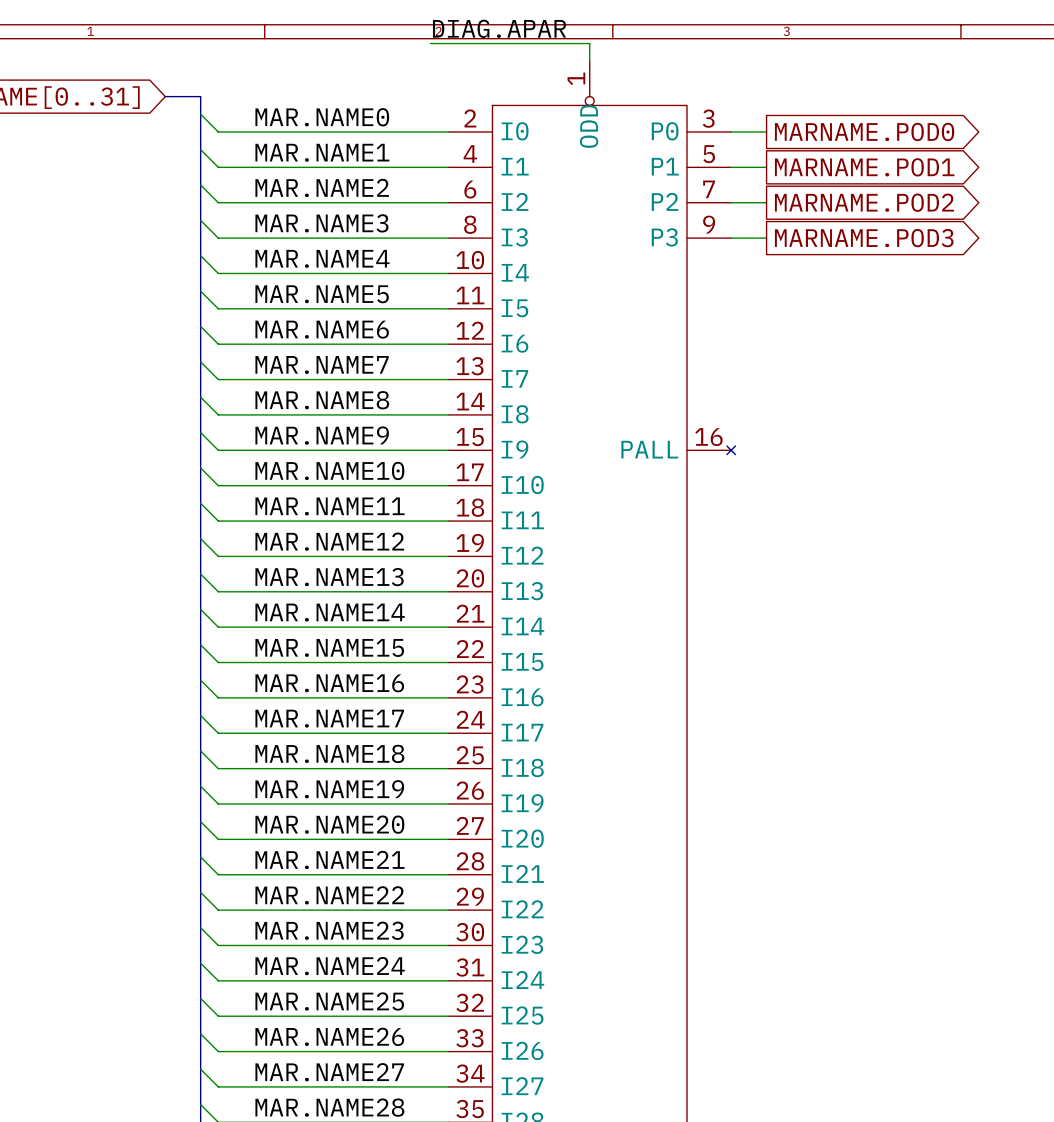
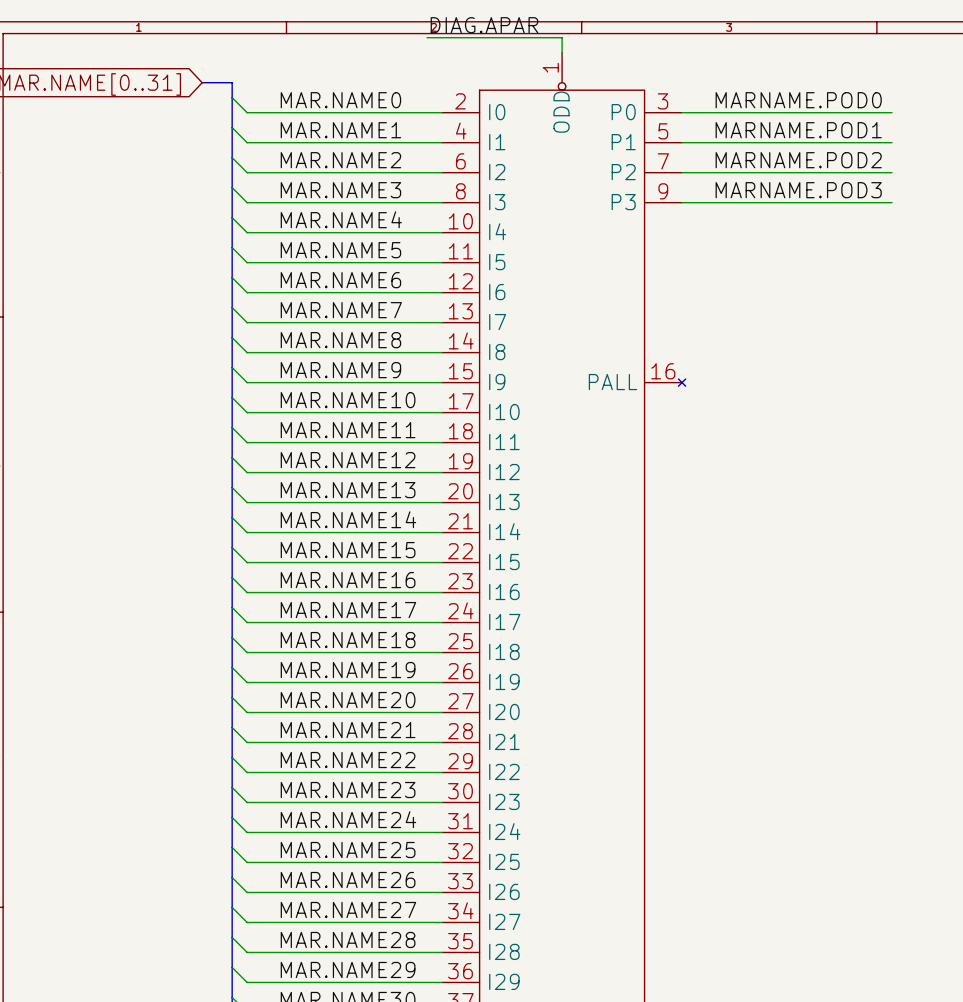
label: none -> MARNAME.POD0 (798, 100)
wire: none -> (712, 112) (891, 112)
global label: MARNAME.POD0 (864, 131) -> none
label: none -> MARNAME.POD1 (798, 130)
wire: none -> (712, 142) (891, 142)
global label: MARNAME.POD1 (864, 167) -> none
label: none -> MARNAME.POD2 (798, 160)
wire: none -> (712, 172) (891, 172)
global label: MARNAME.POD2 (864, 202) -> none
label: none -> MARNAME.POD3 (798, 190)
wire: none -> (712, 202) (891, 202)
global label: MARNAME.POD3 (864, 238) -> none

